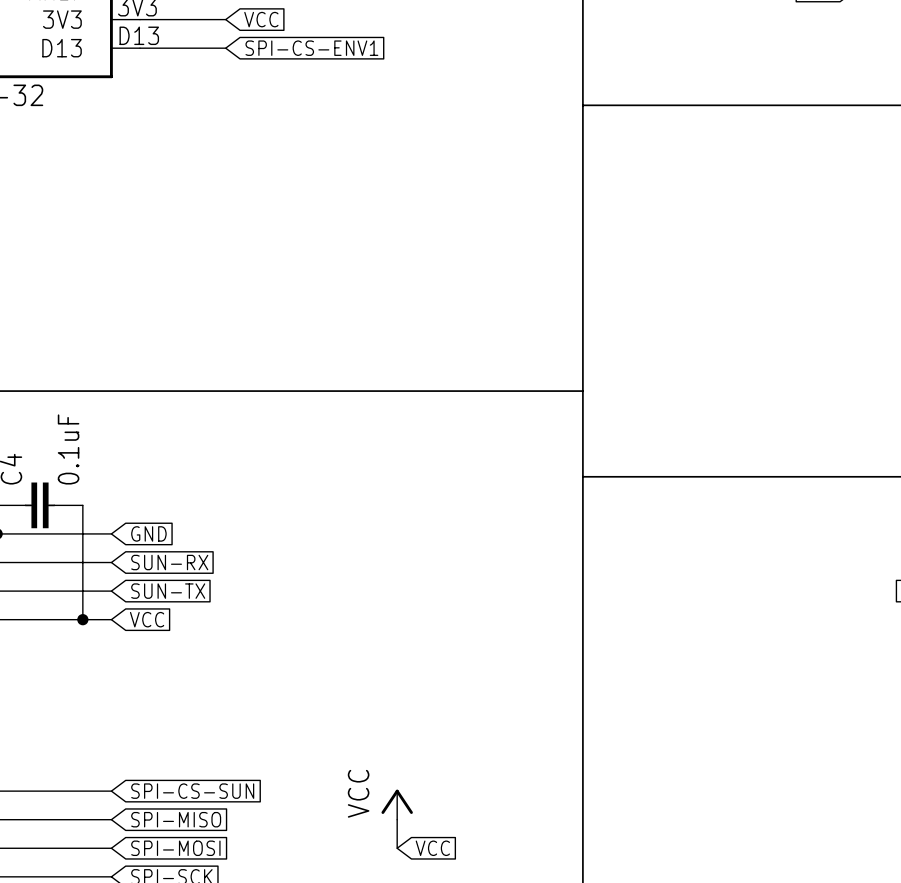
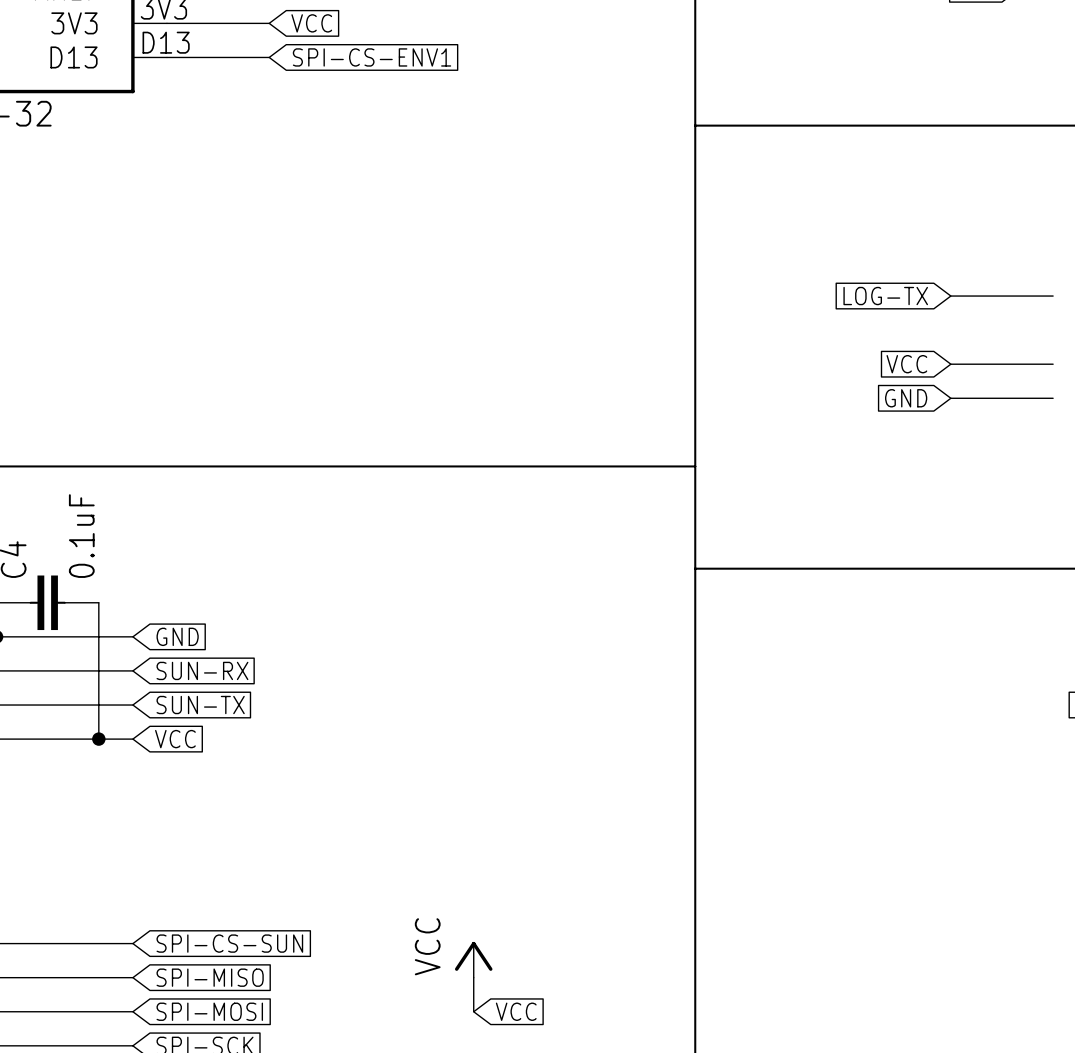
global label: none -> LOG-TX (885, 296)
wire: none -> (950, 296) (1053, 296)
global label: none -> VCC (906, 364)
wire: none -> (950, 364) (1053, 364)
global label: none -> GND (906, 398)
wire: none -> (950, 398) (1053, 398)

